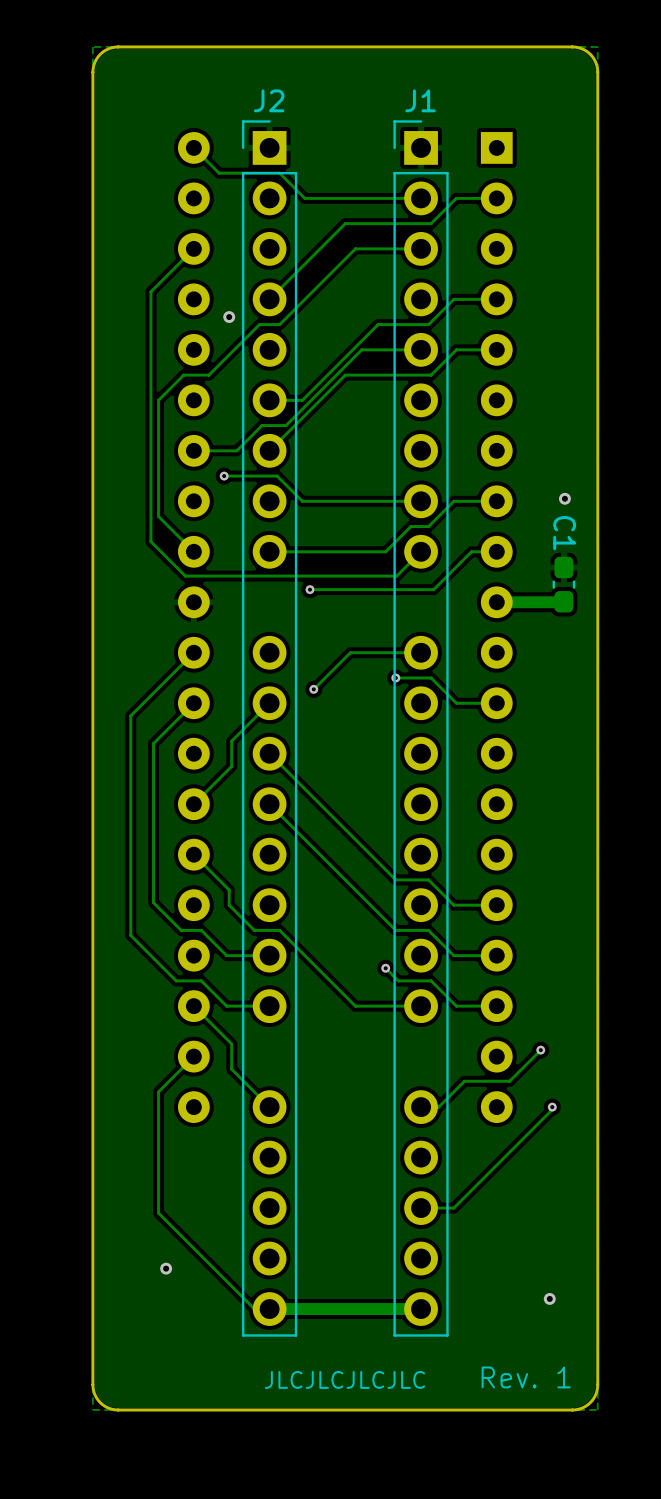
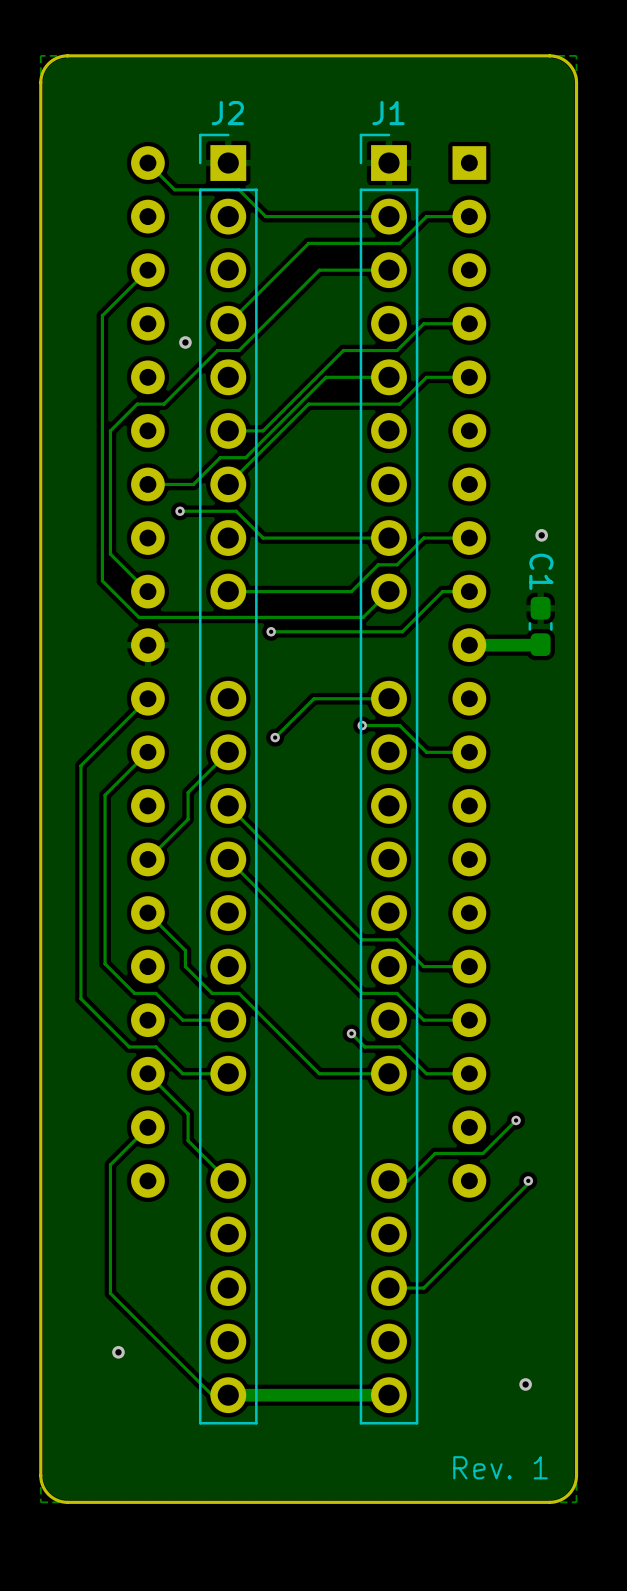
text: JLCJLCJLCJLC (344, 1379) -> none

